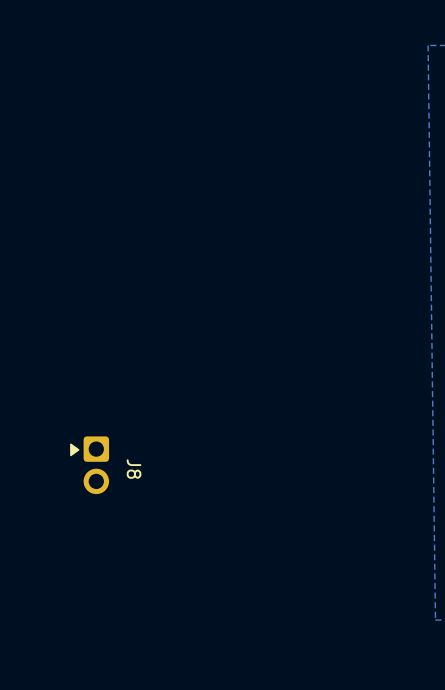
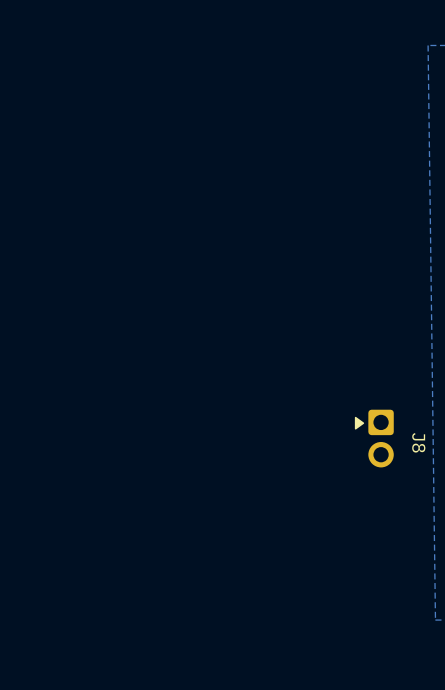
J8 position: (89, 465) -> (374, 438)

